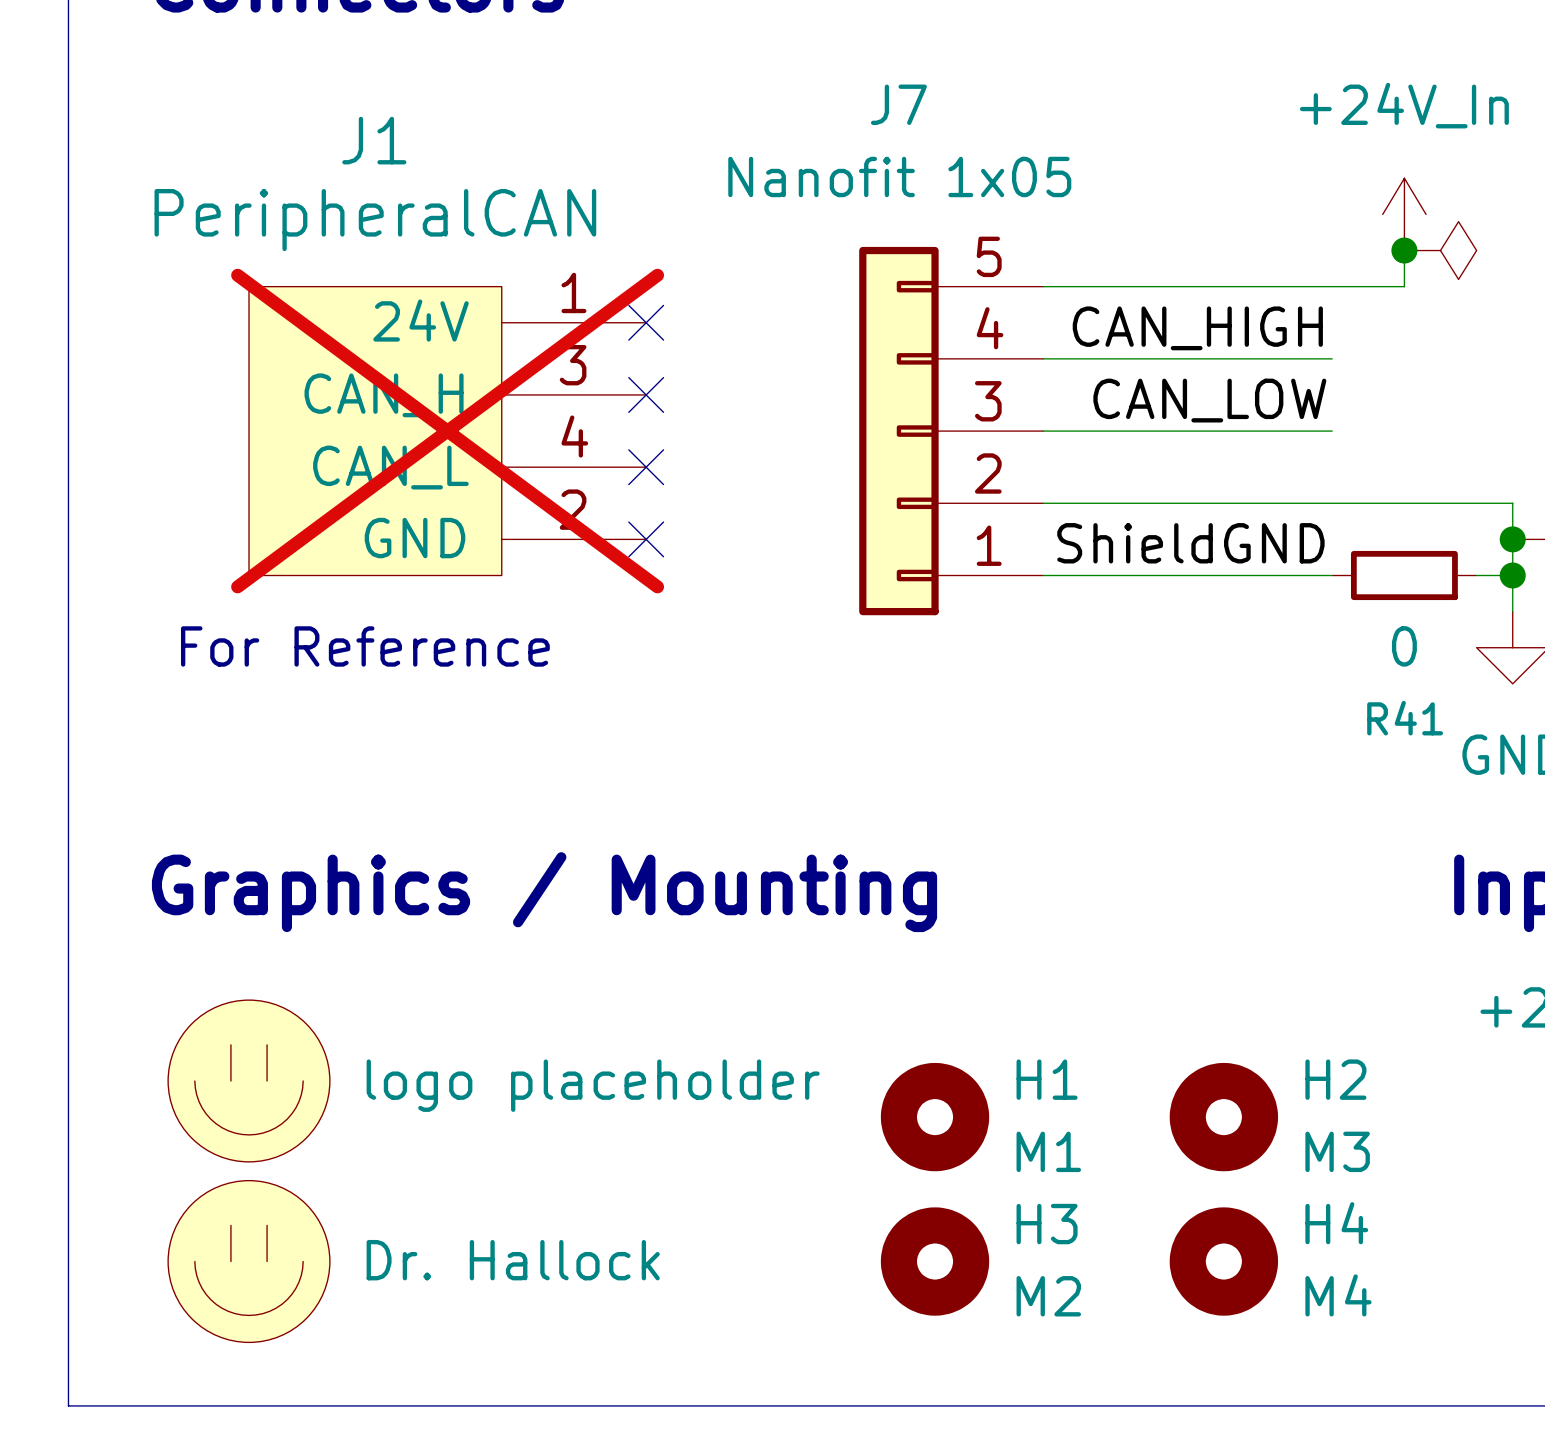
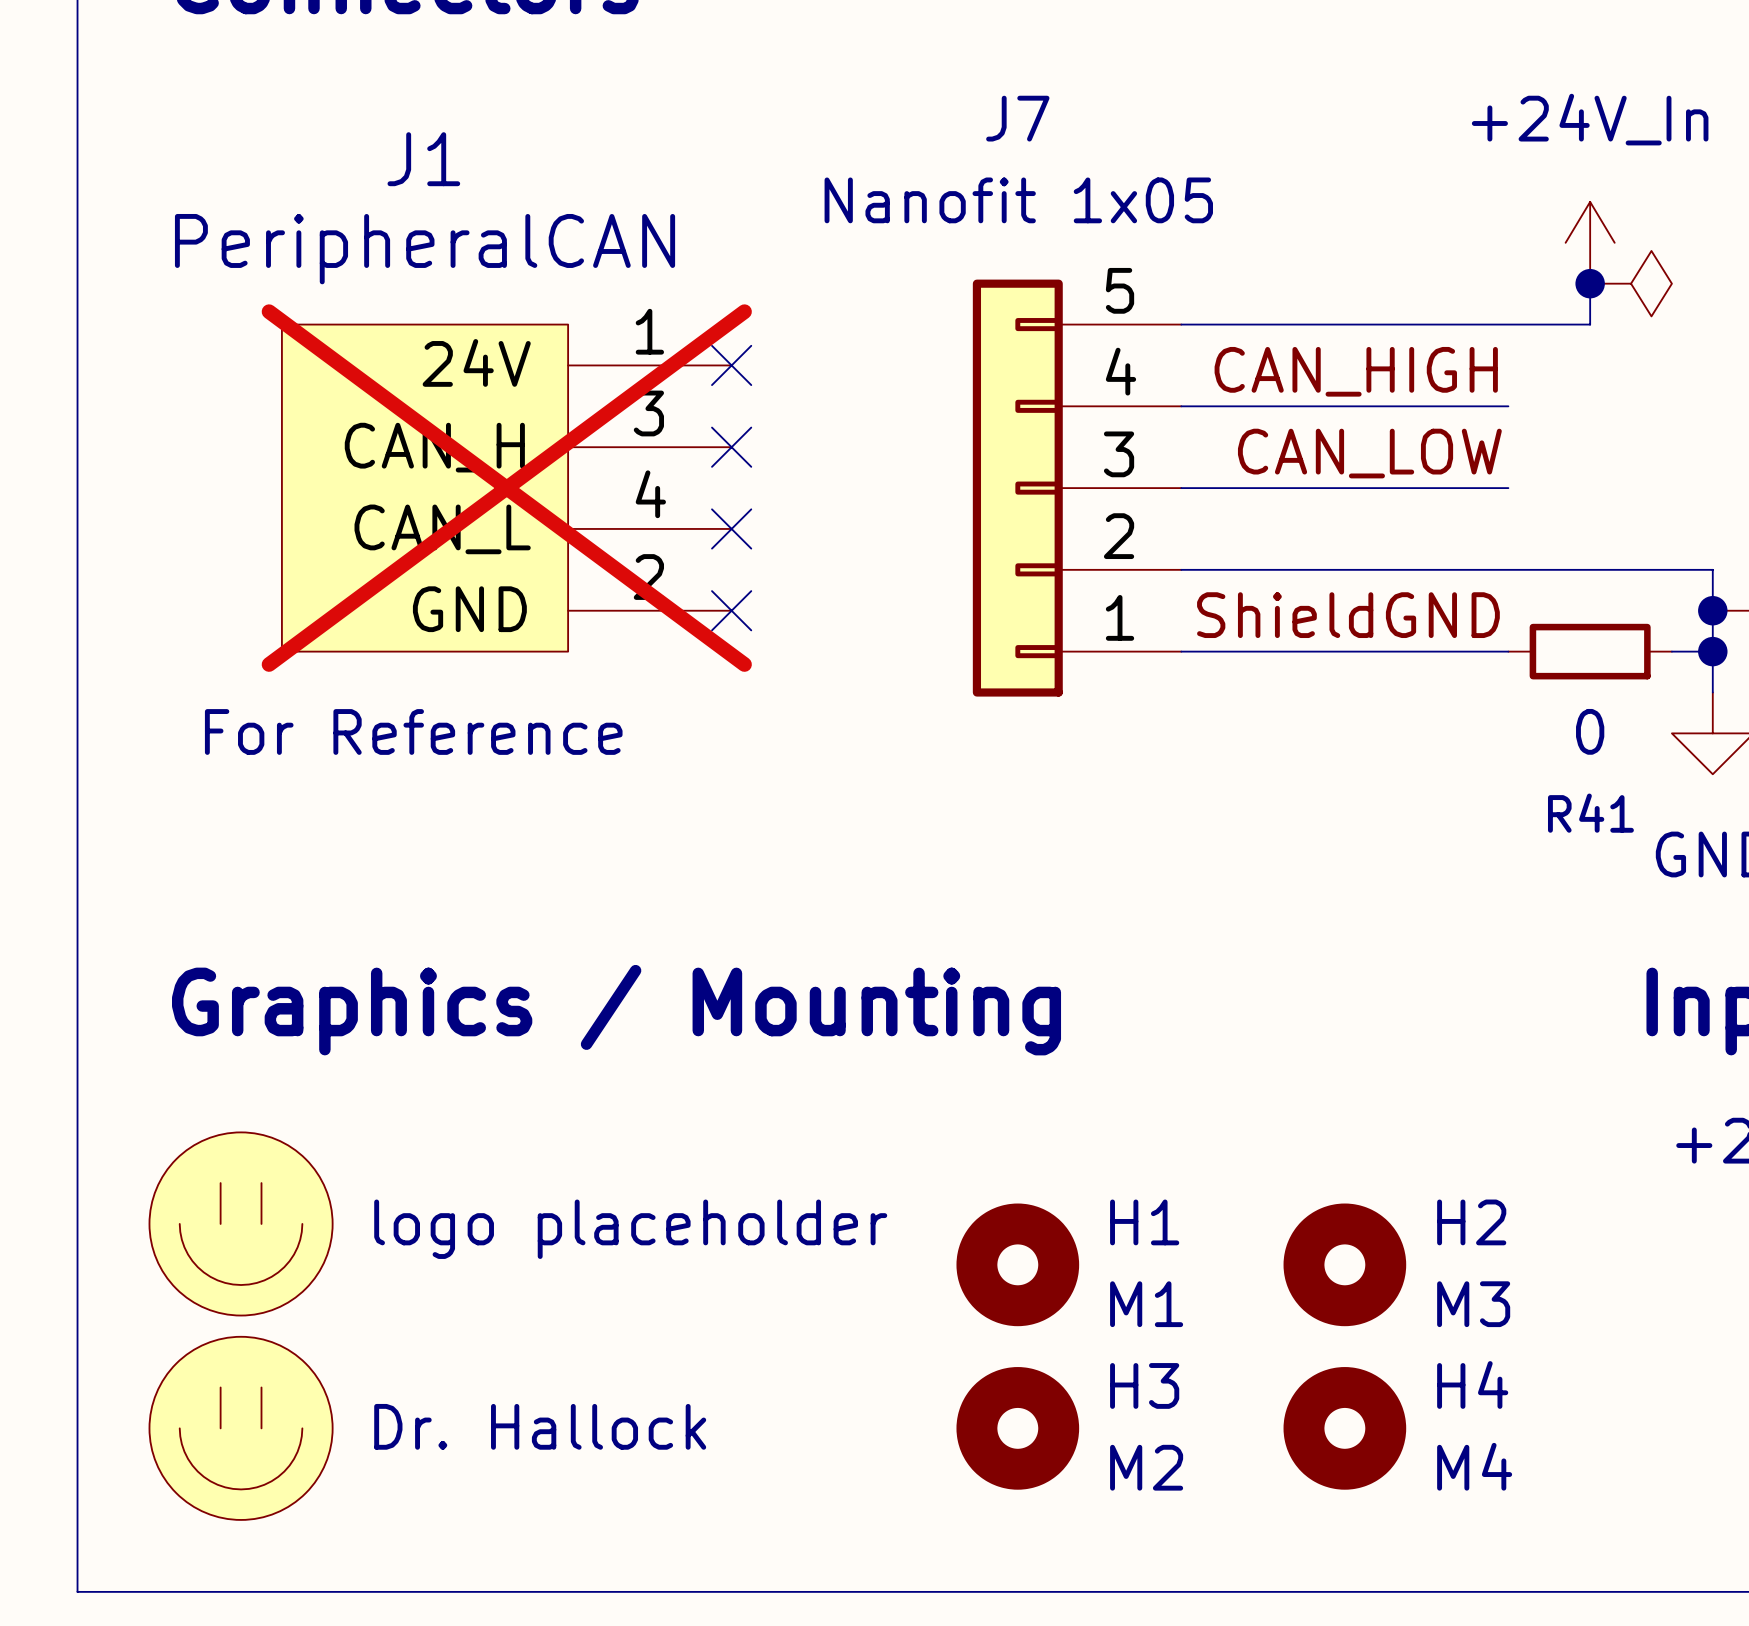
part position: (249, 1080) -> (241, 1223)
H1 position: (935, 1117) -> (1017, 1264)
H2 position: (1223, 1117) -> (1344, 1264)
part position: (249, 1261) -> (241, 1428)
H3 position: (935, 1261) -> (1017, 1428)
H4 position: (1223, 1261) -> (1344, 1428)

